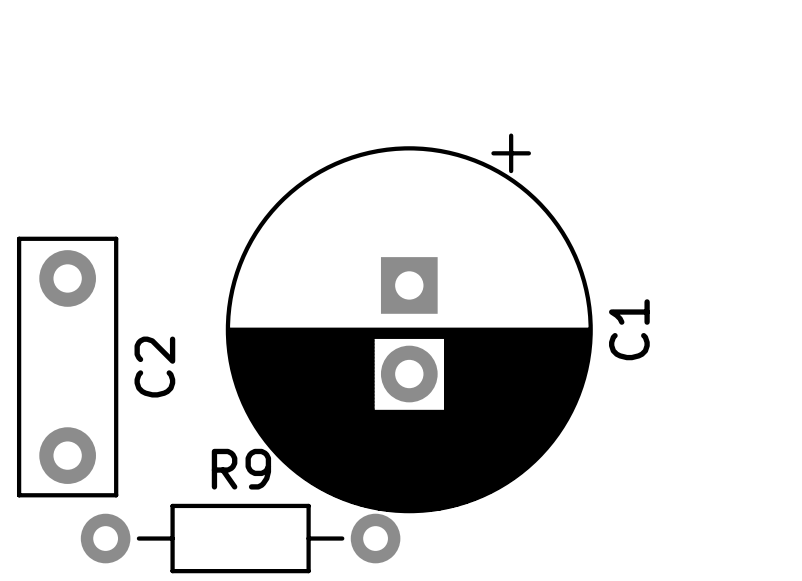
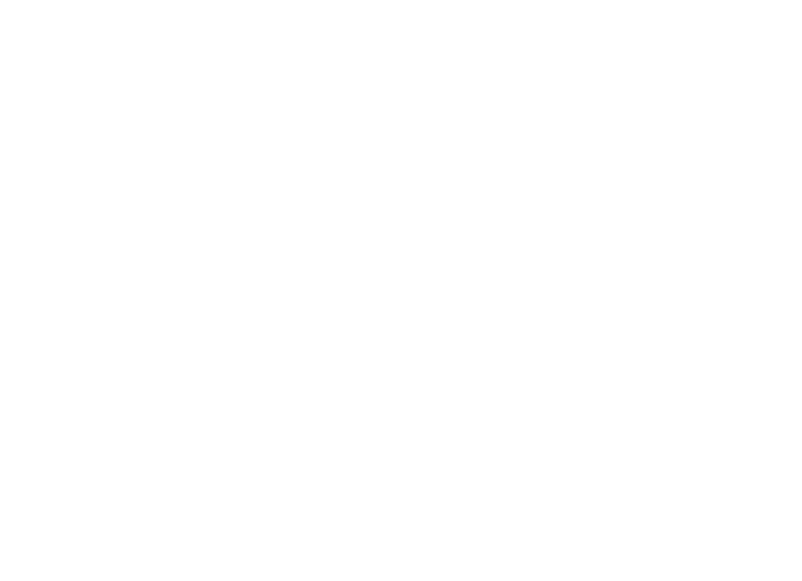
C1: (409, 323) -> none
C2: (67, 367) -> none
R9: (240, 538) -> none

